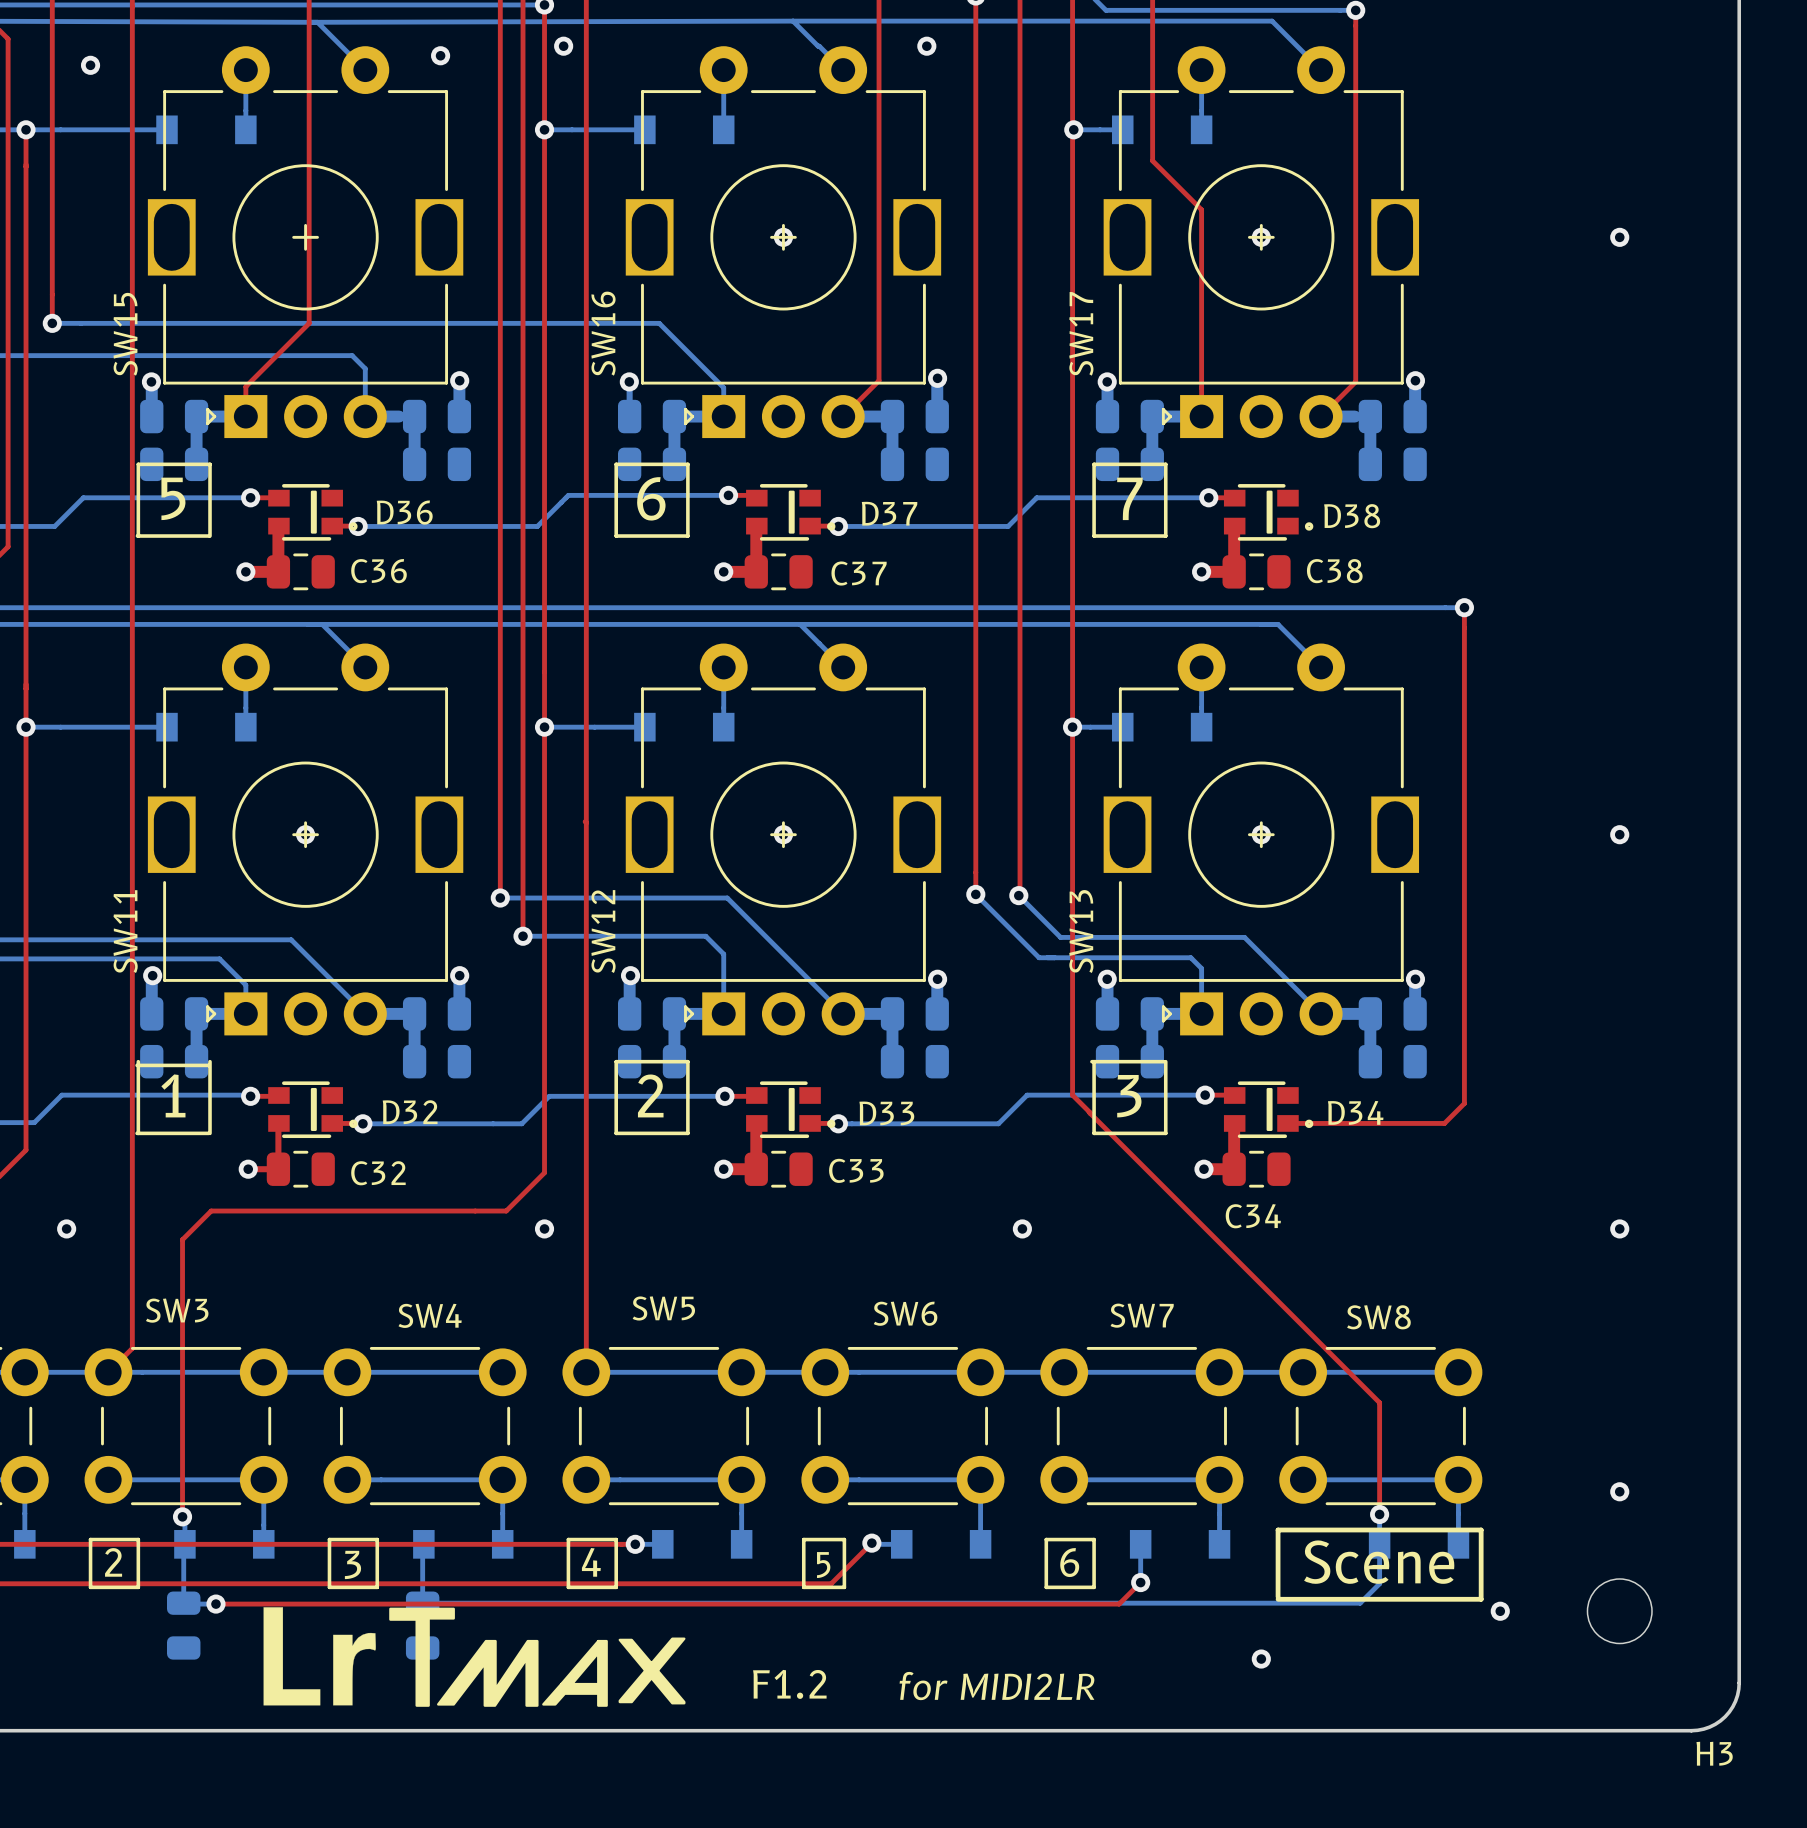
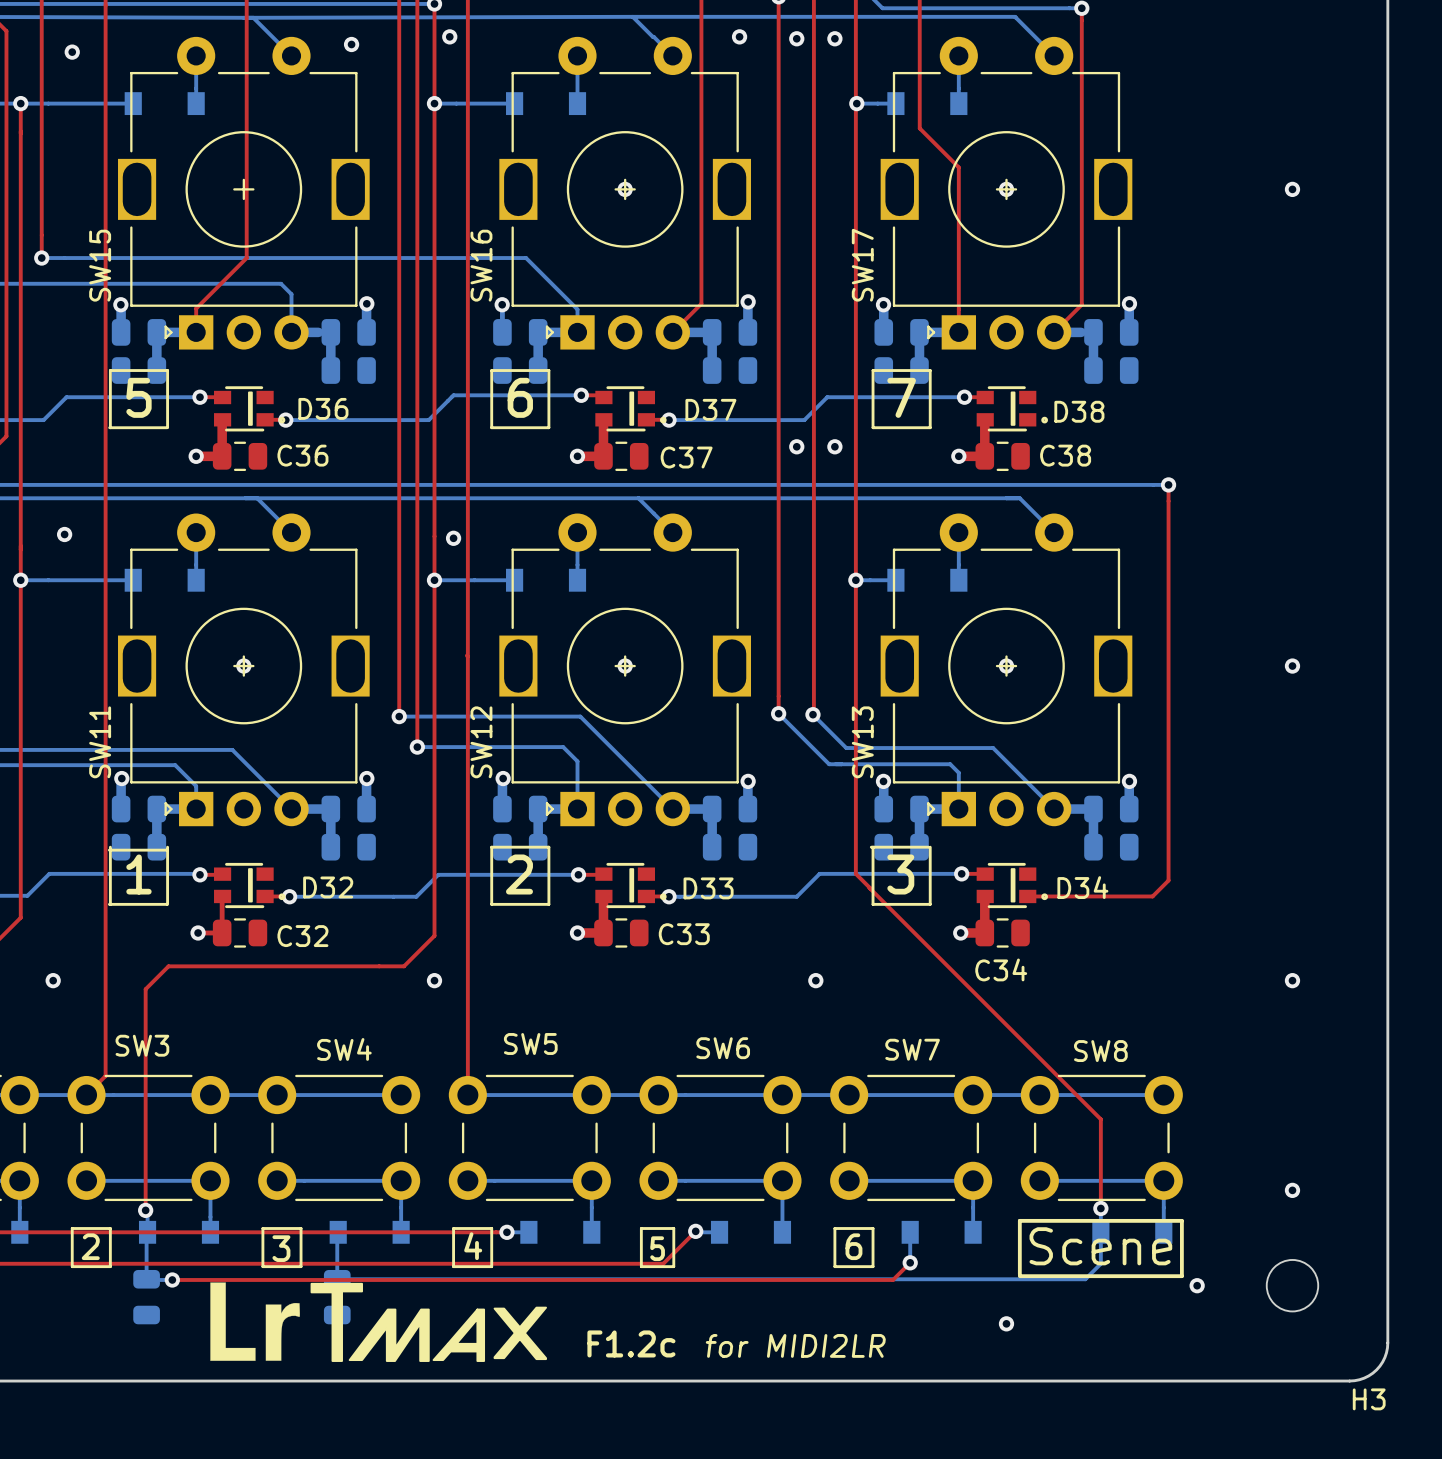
via: none -> (796, 38)
via: none -> (834, 38)
via: none -> (796, 446)
via: none -> (834, 446)
via: none -> (64, 534)
via: none -> (453, 538)
text: F1.2 (789, 1684) -> F1.2c (631, 1343)

